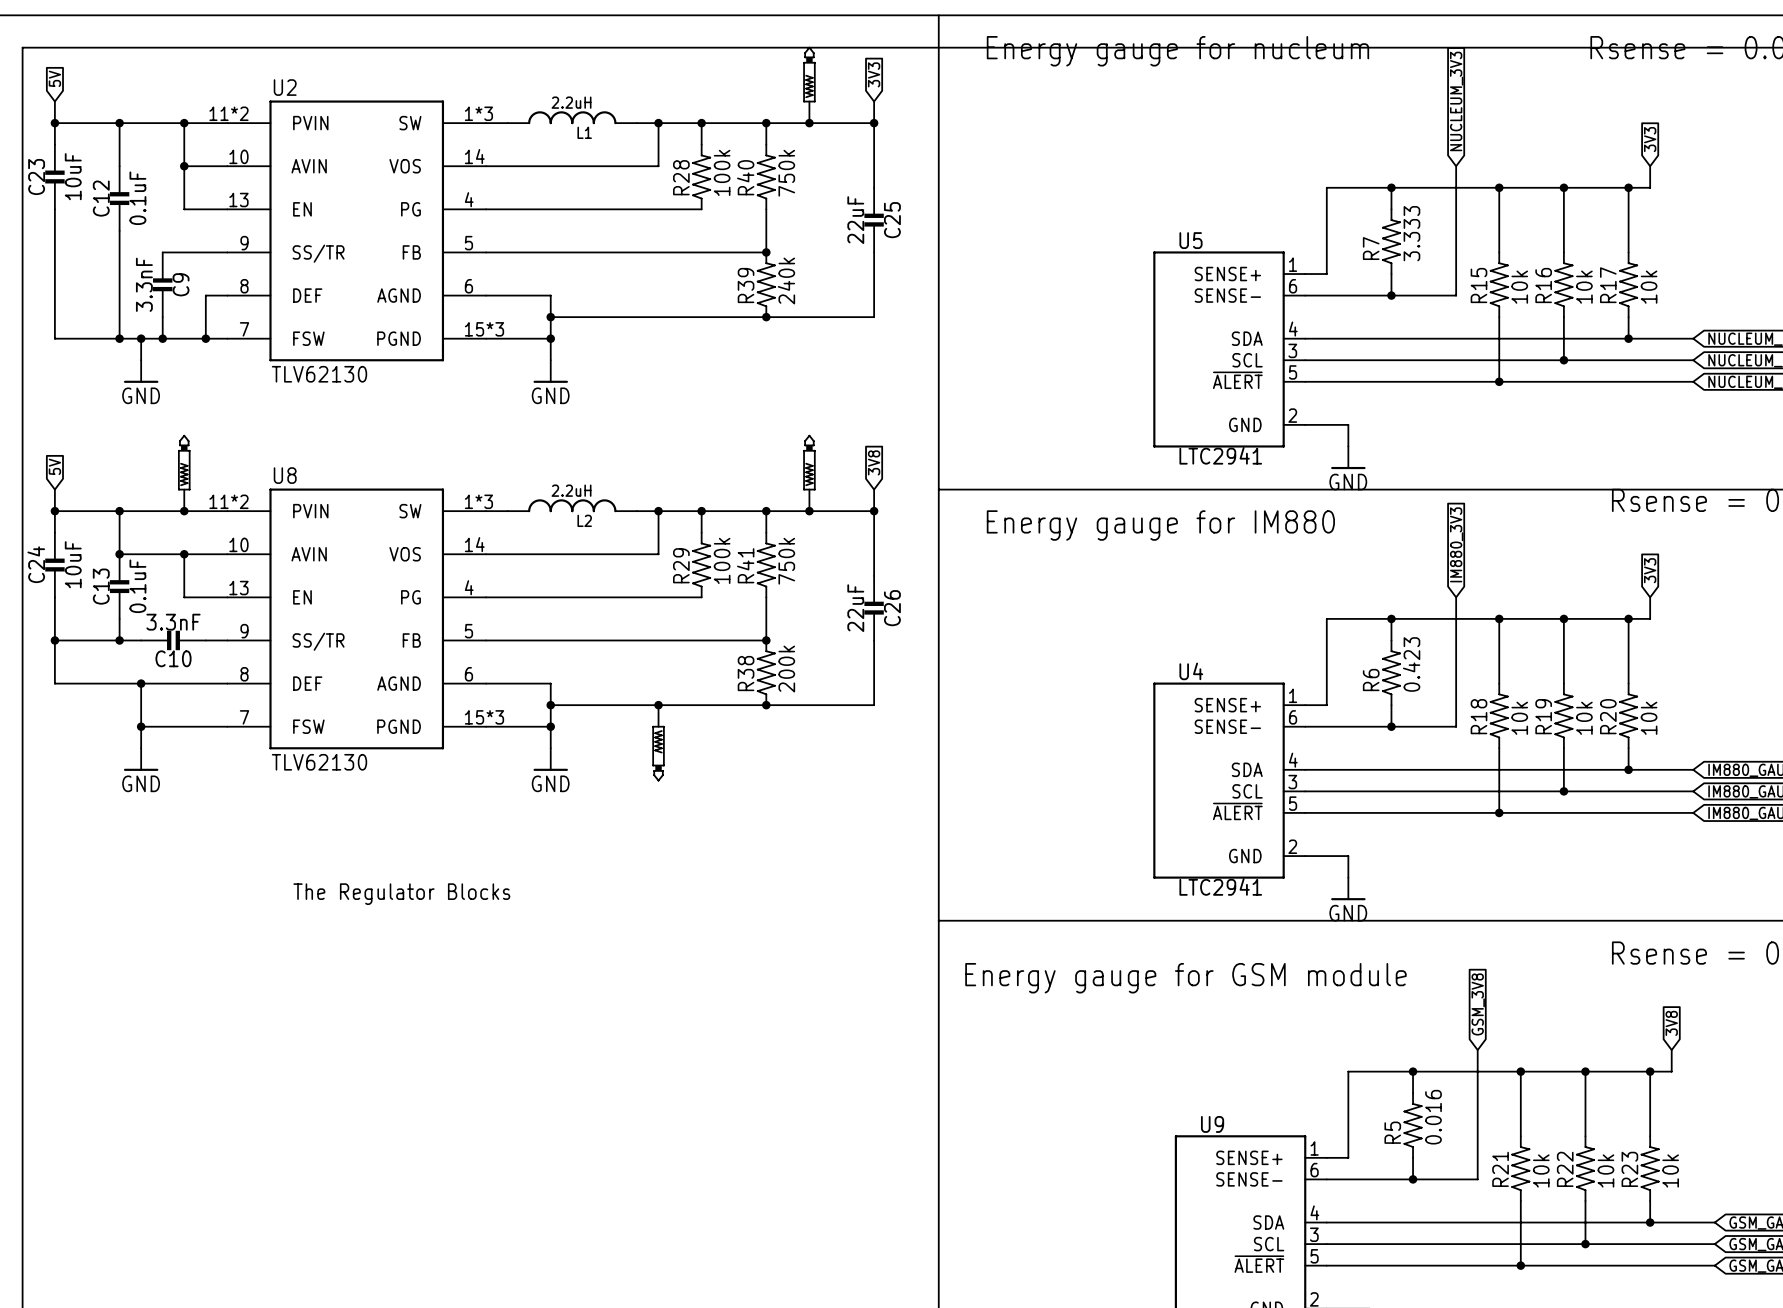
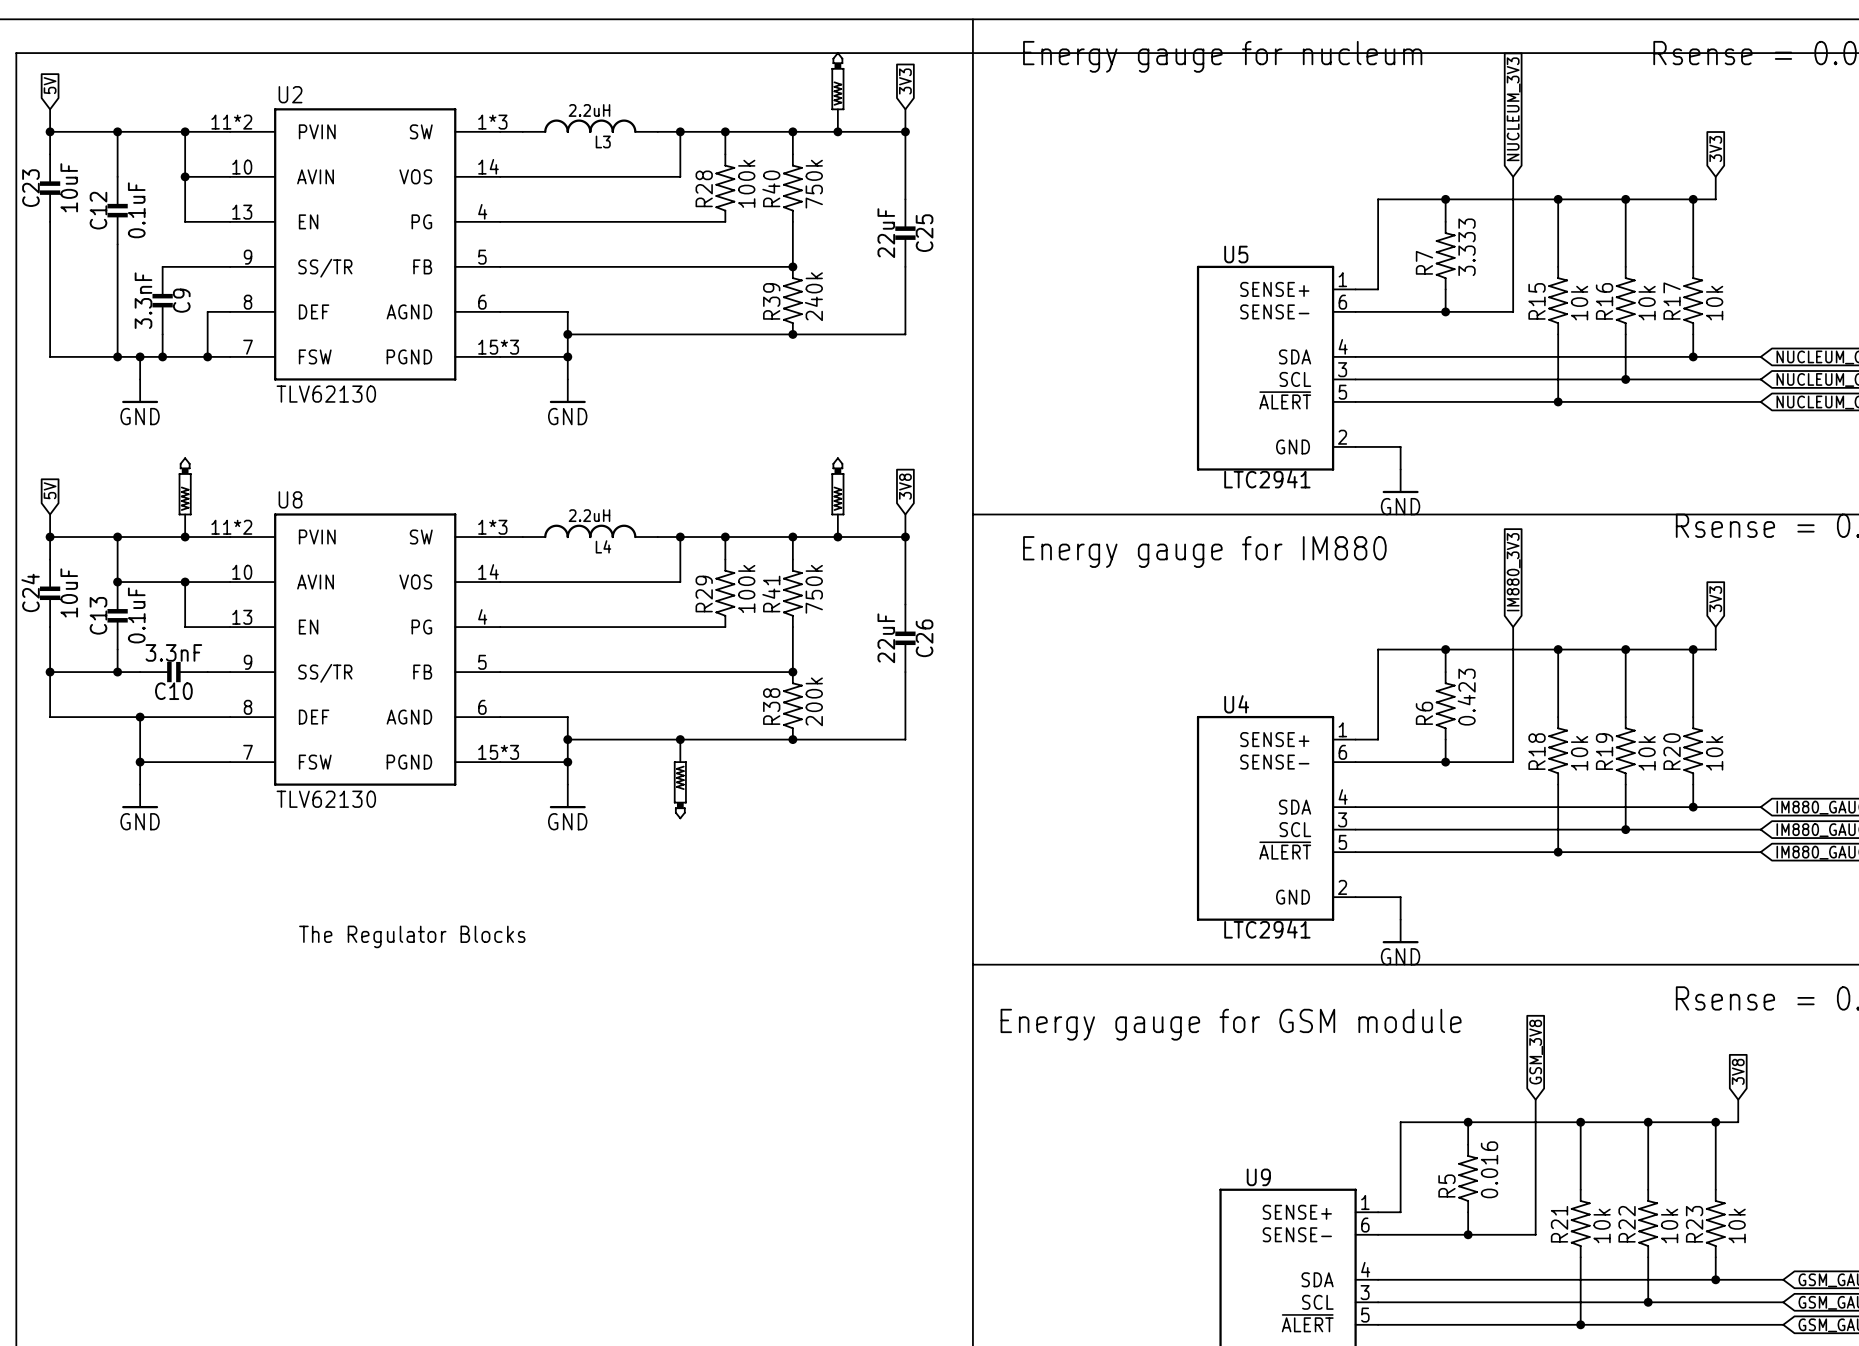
L1 name: L1 (584, 132) -> L3 (603, 141)
L2 name: L2 (584, 520) -> L4 (603, 546)

